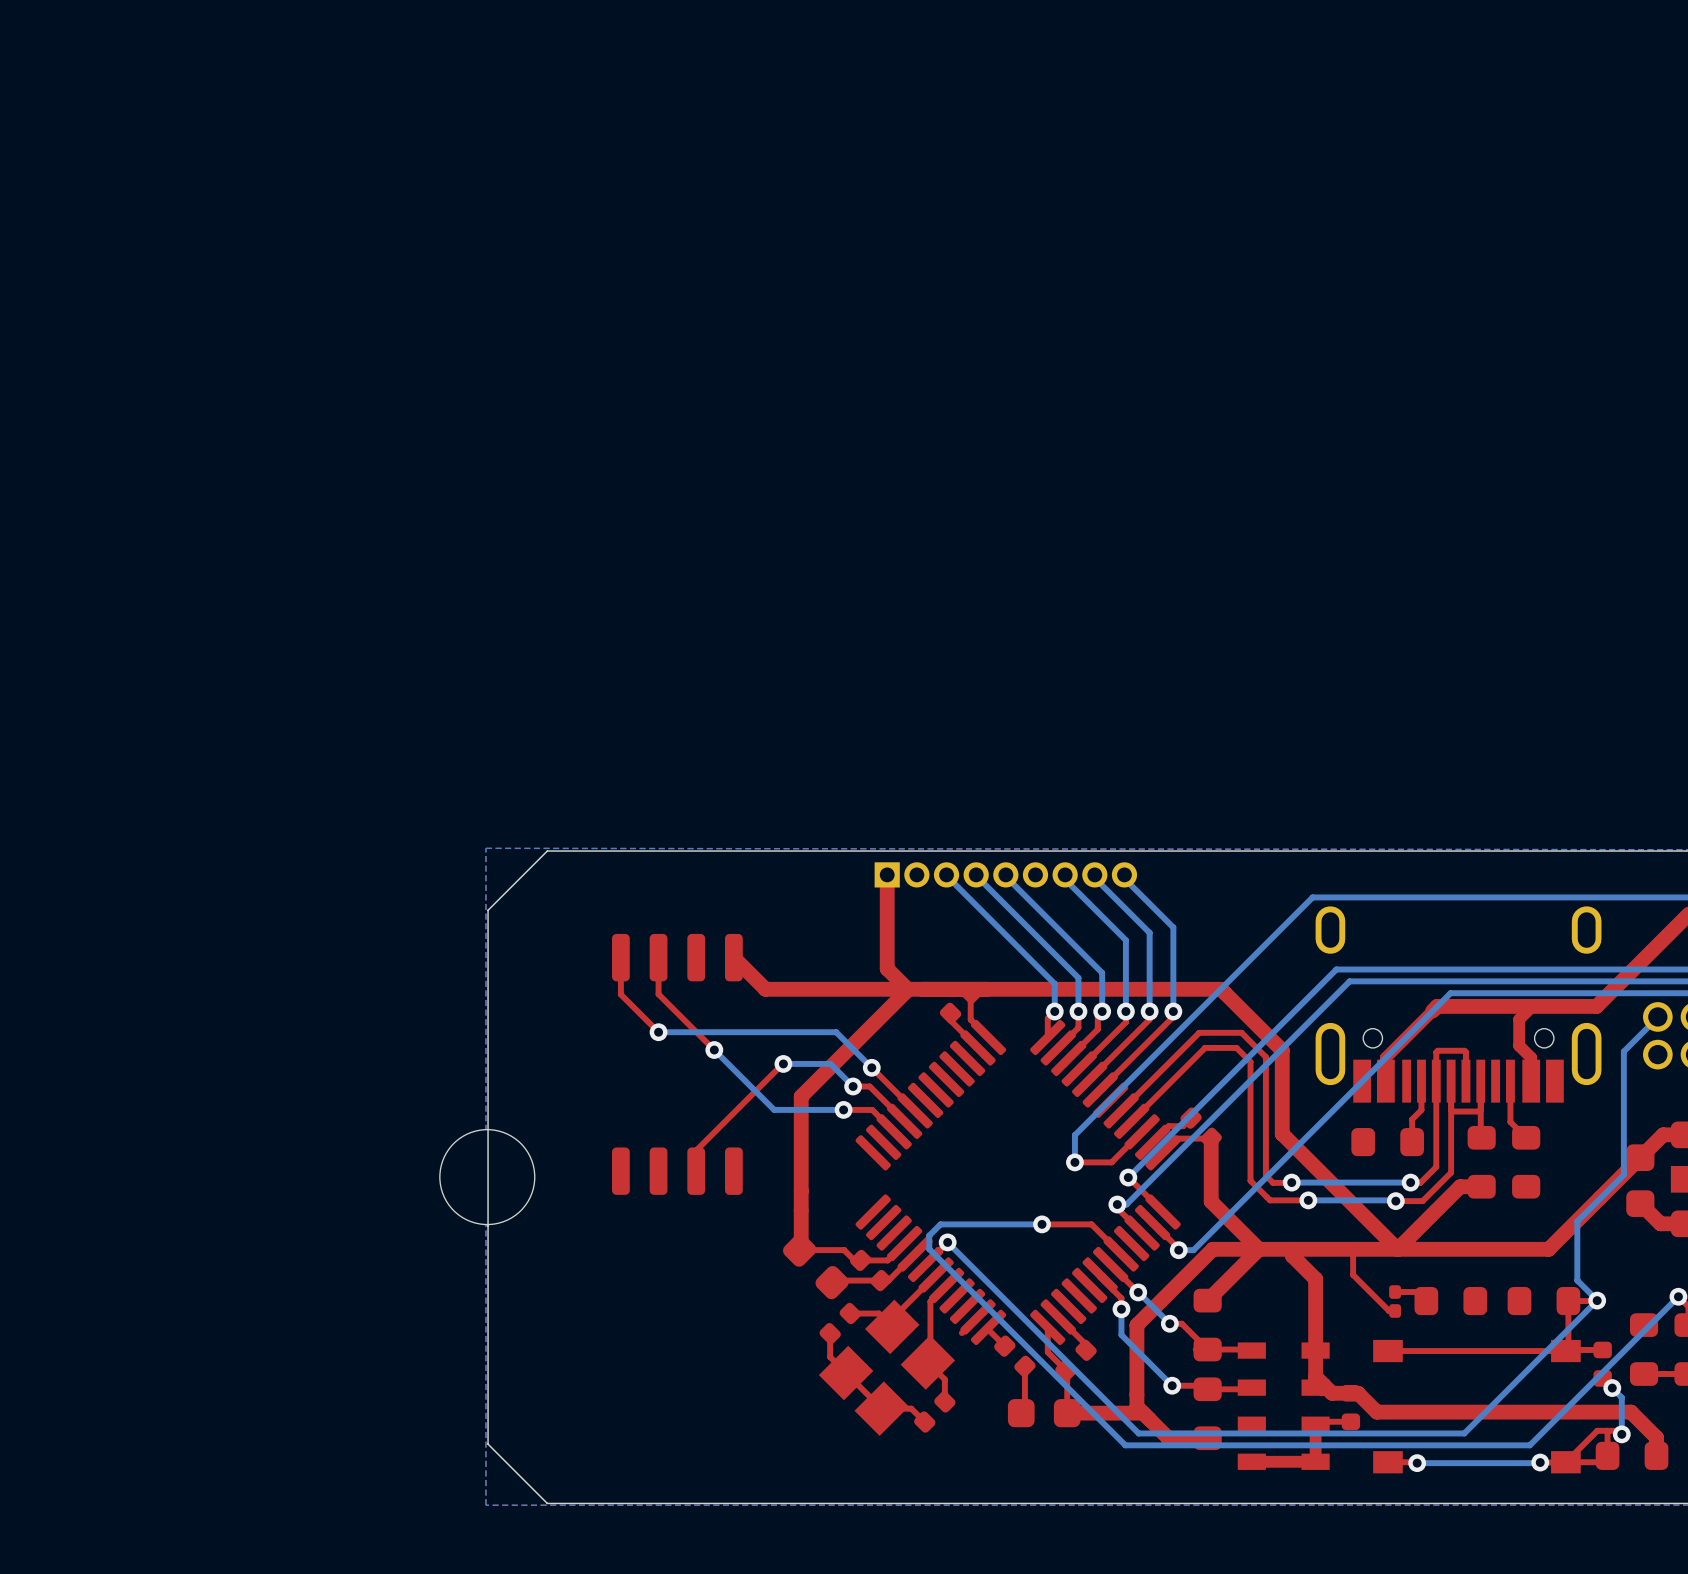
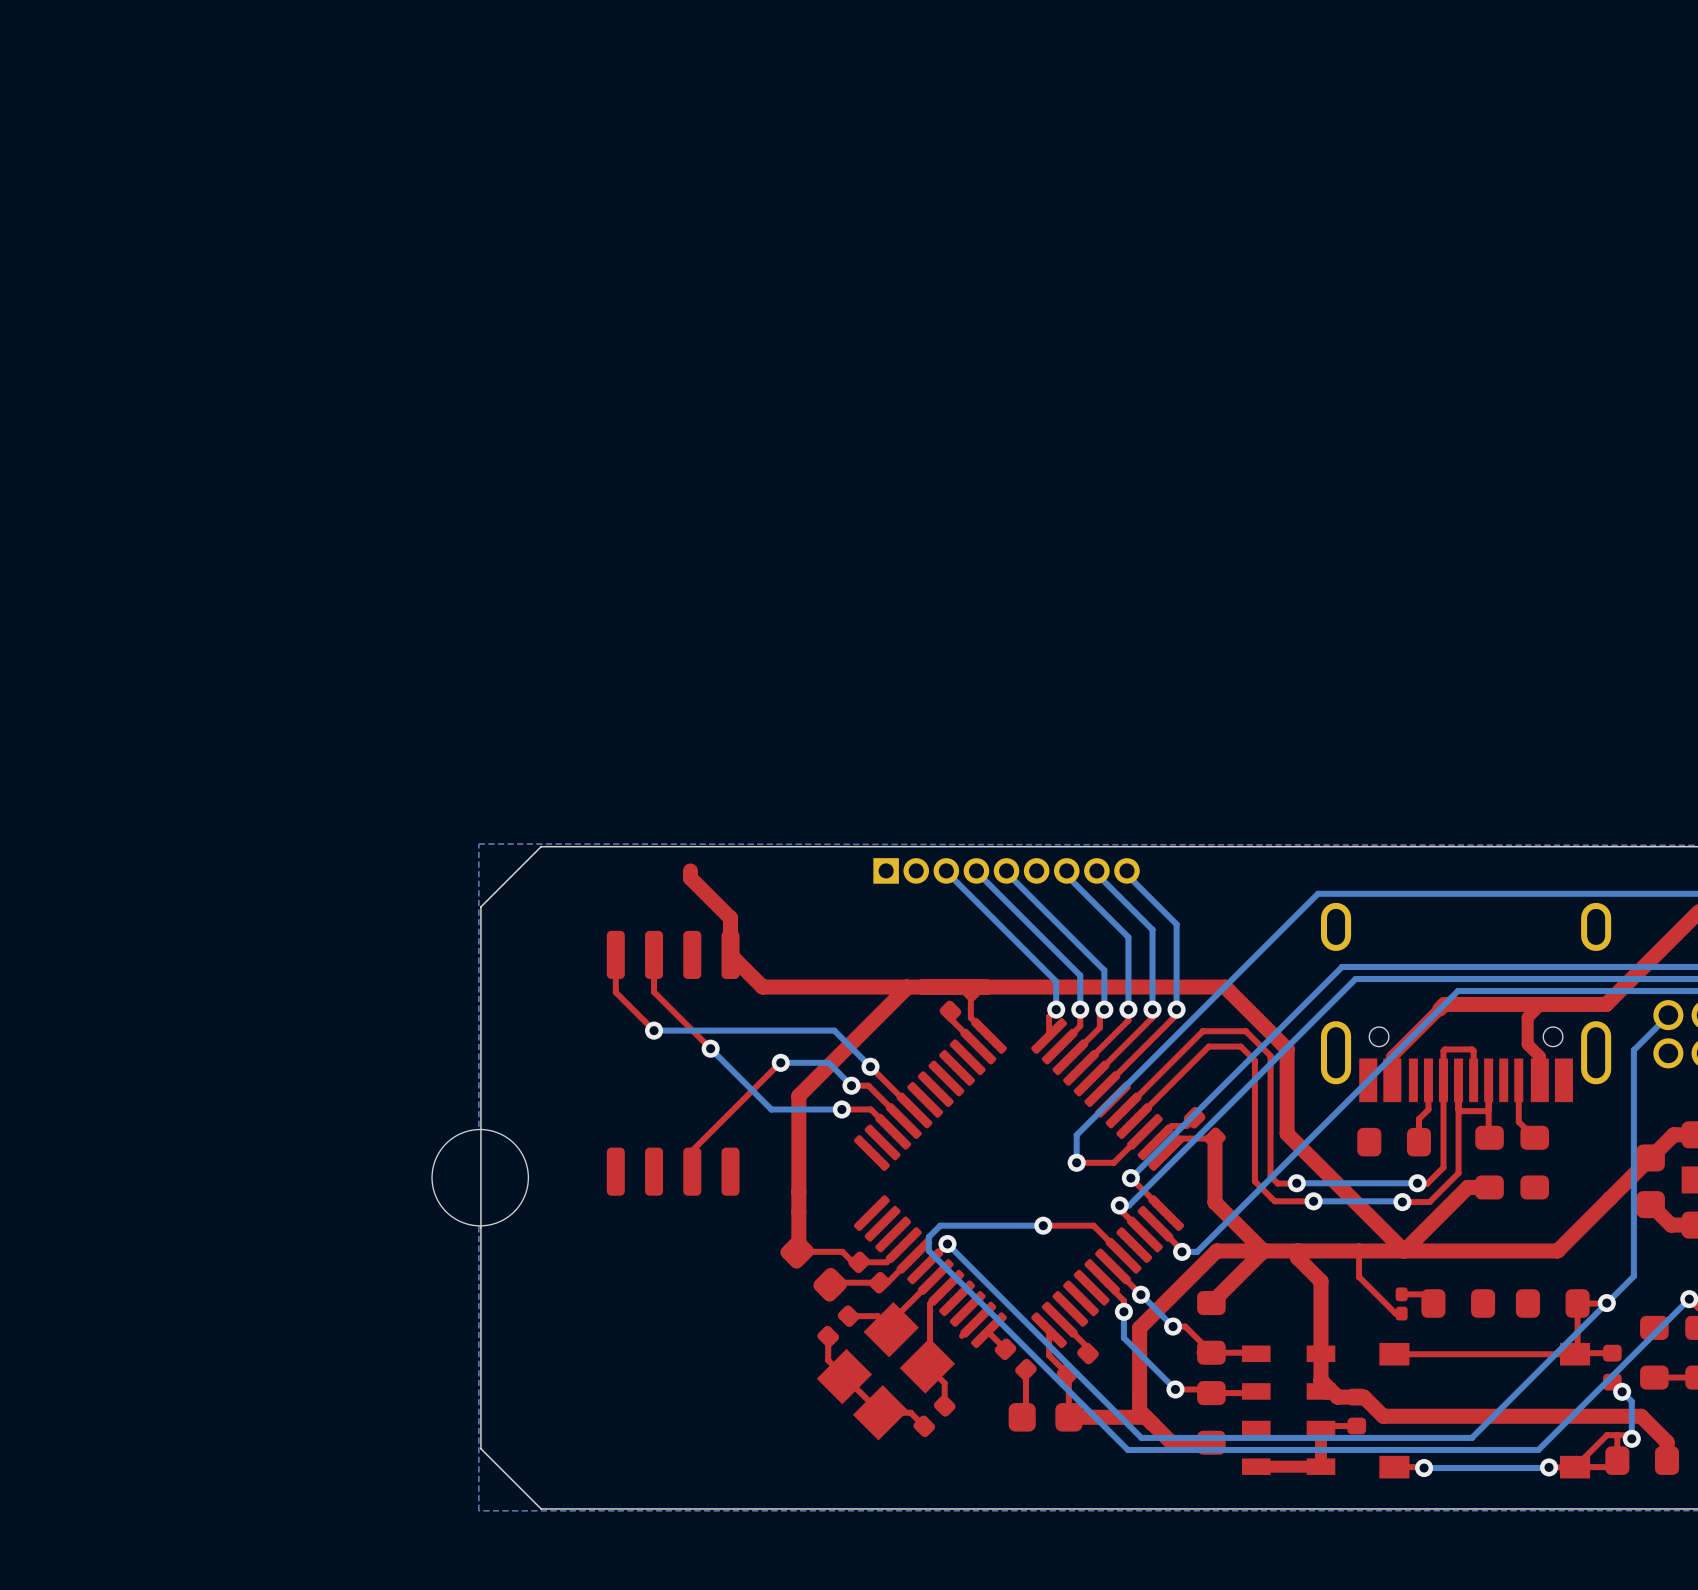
top track: none -> (690, 870) (690, 878) (730, 918) (730, 954)
top track: (887, 874) (887, 968) (907, 989) -> none
bottom track: (1623, 1174) (1577, 1221) (1577, 1280) (1597, 1300) -> (1633, 1175) (1633, 1276) (1606, 1303)

